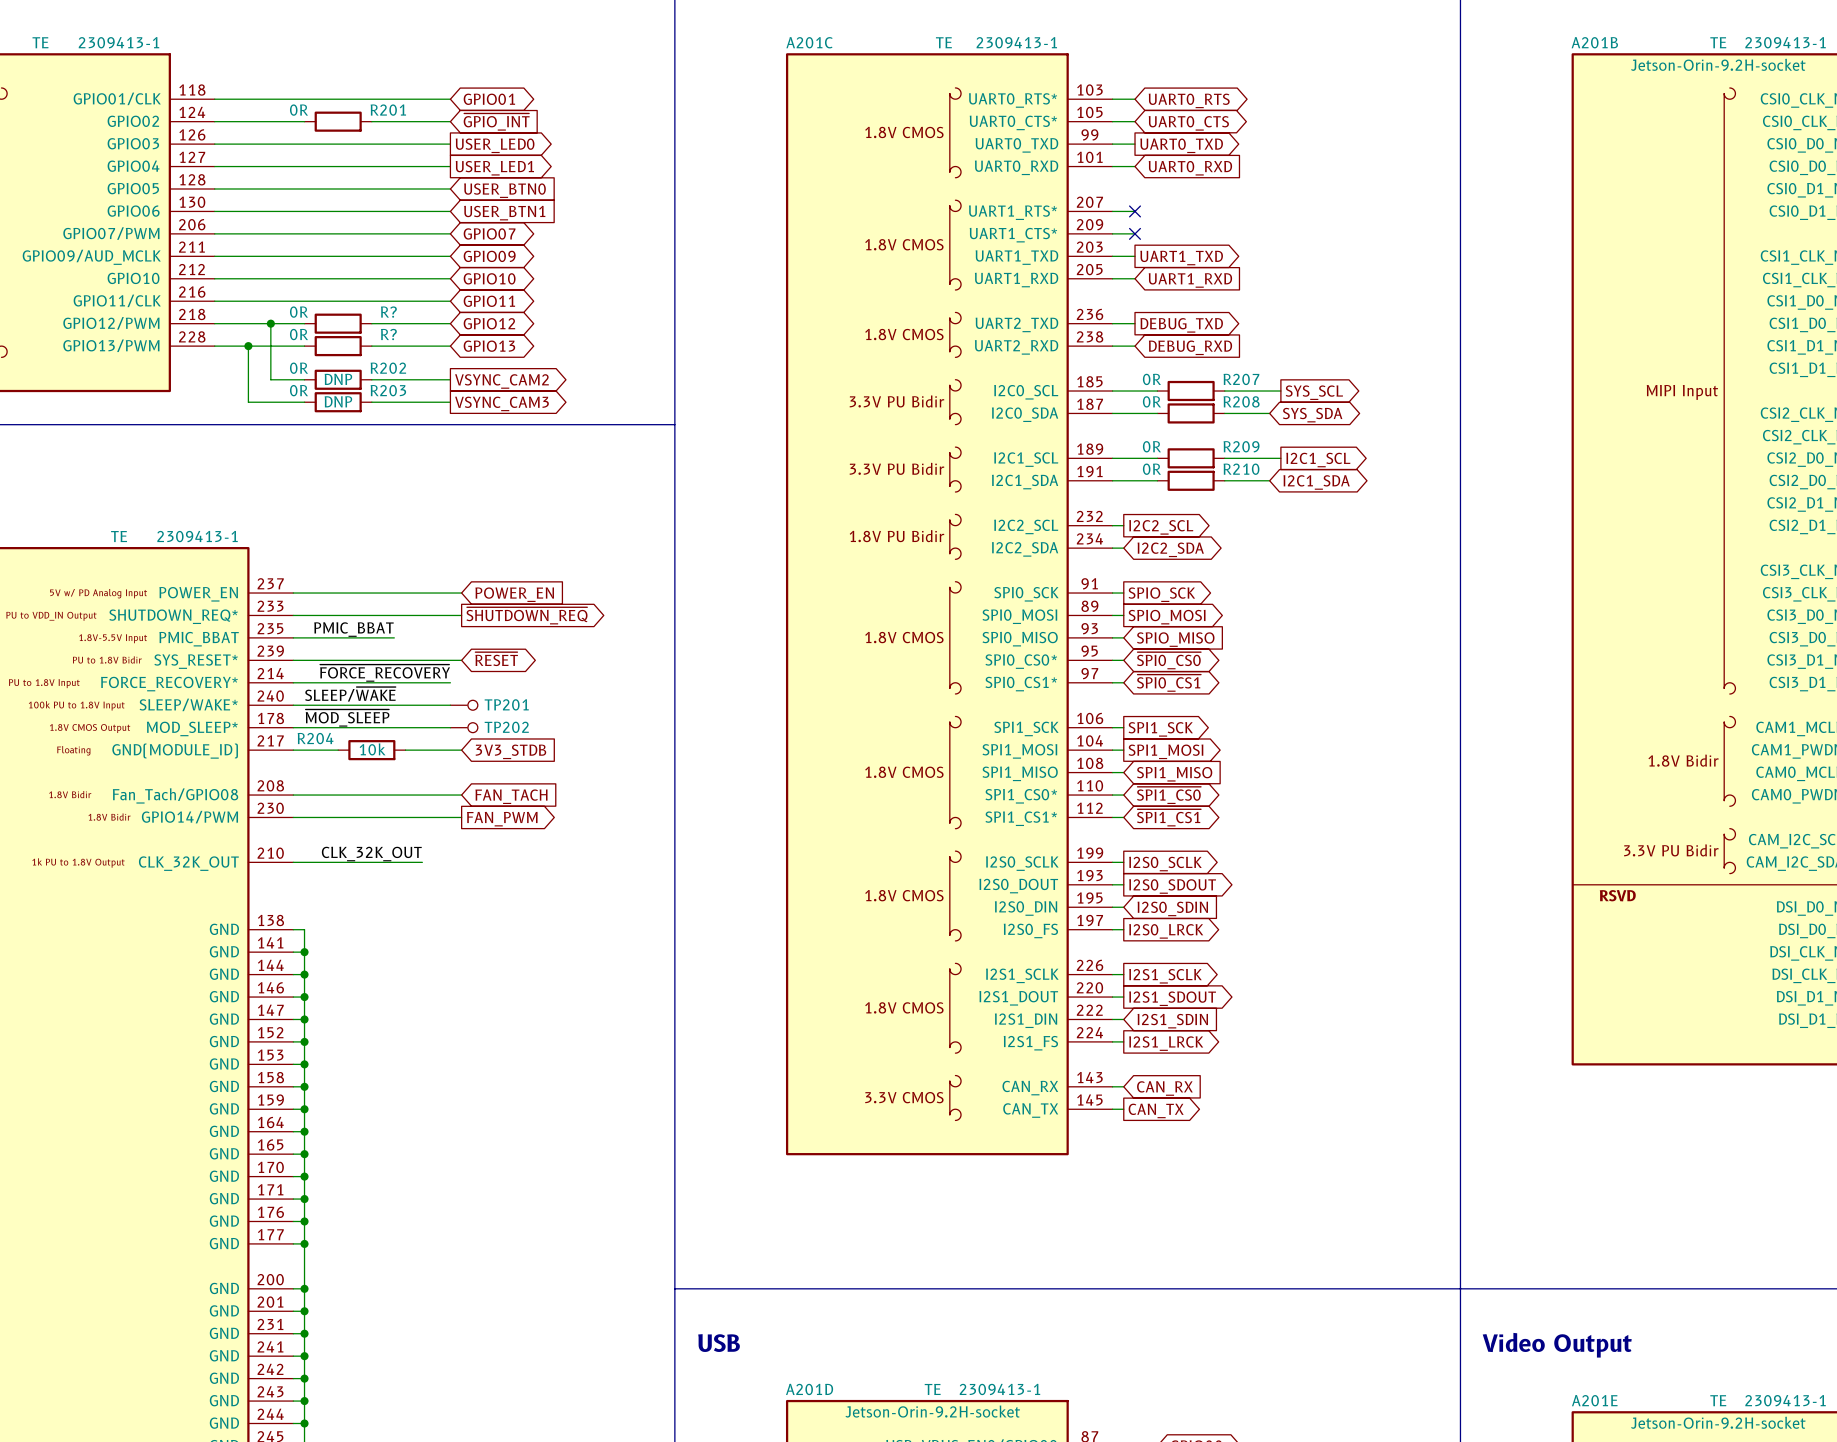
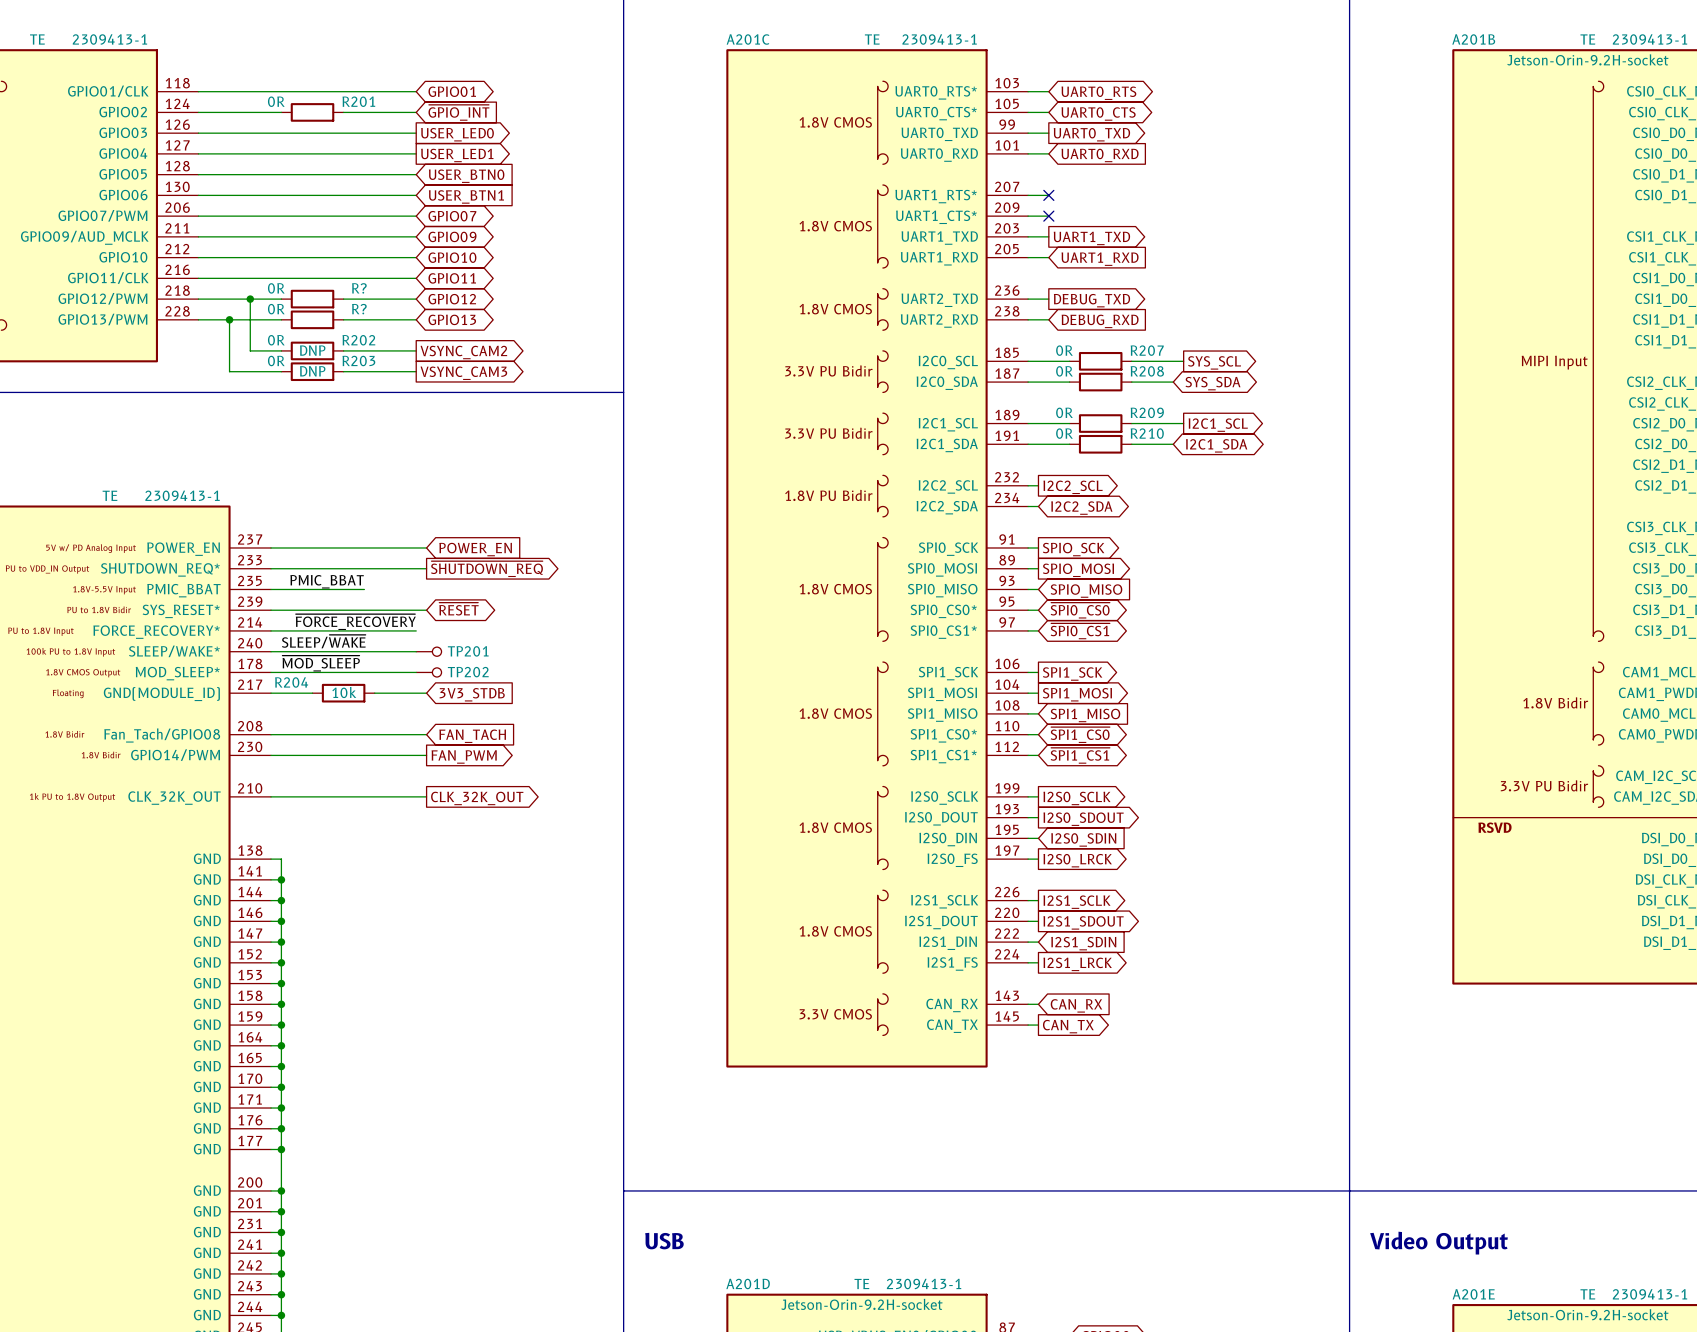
label: CLK_32K_OUT (371, 854) -> none
wire: none -> (390, 796) (426, 796)
global label: none -> CLK_32K_OUT (477, 798)

